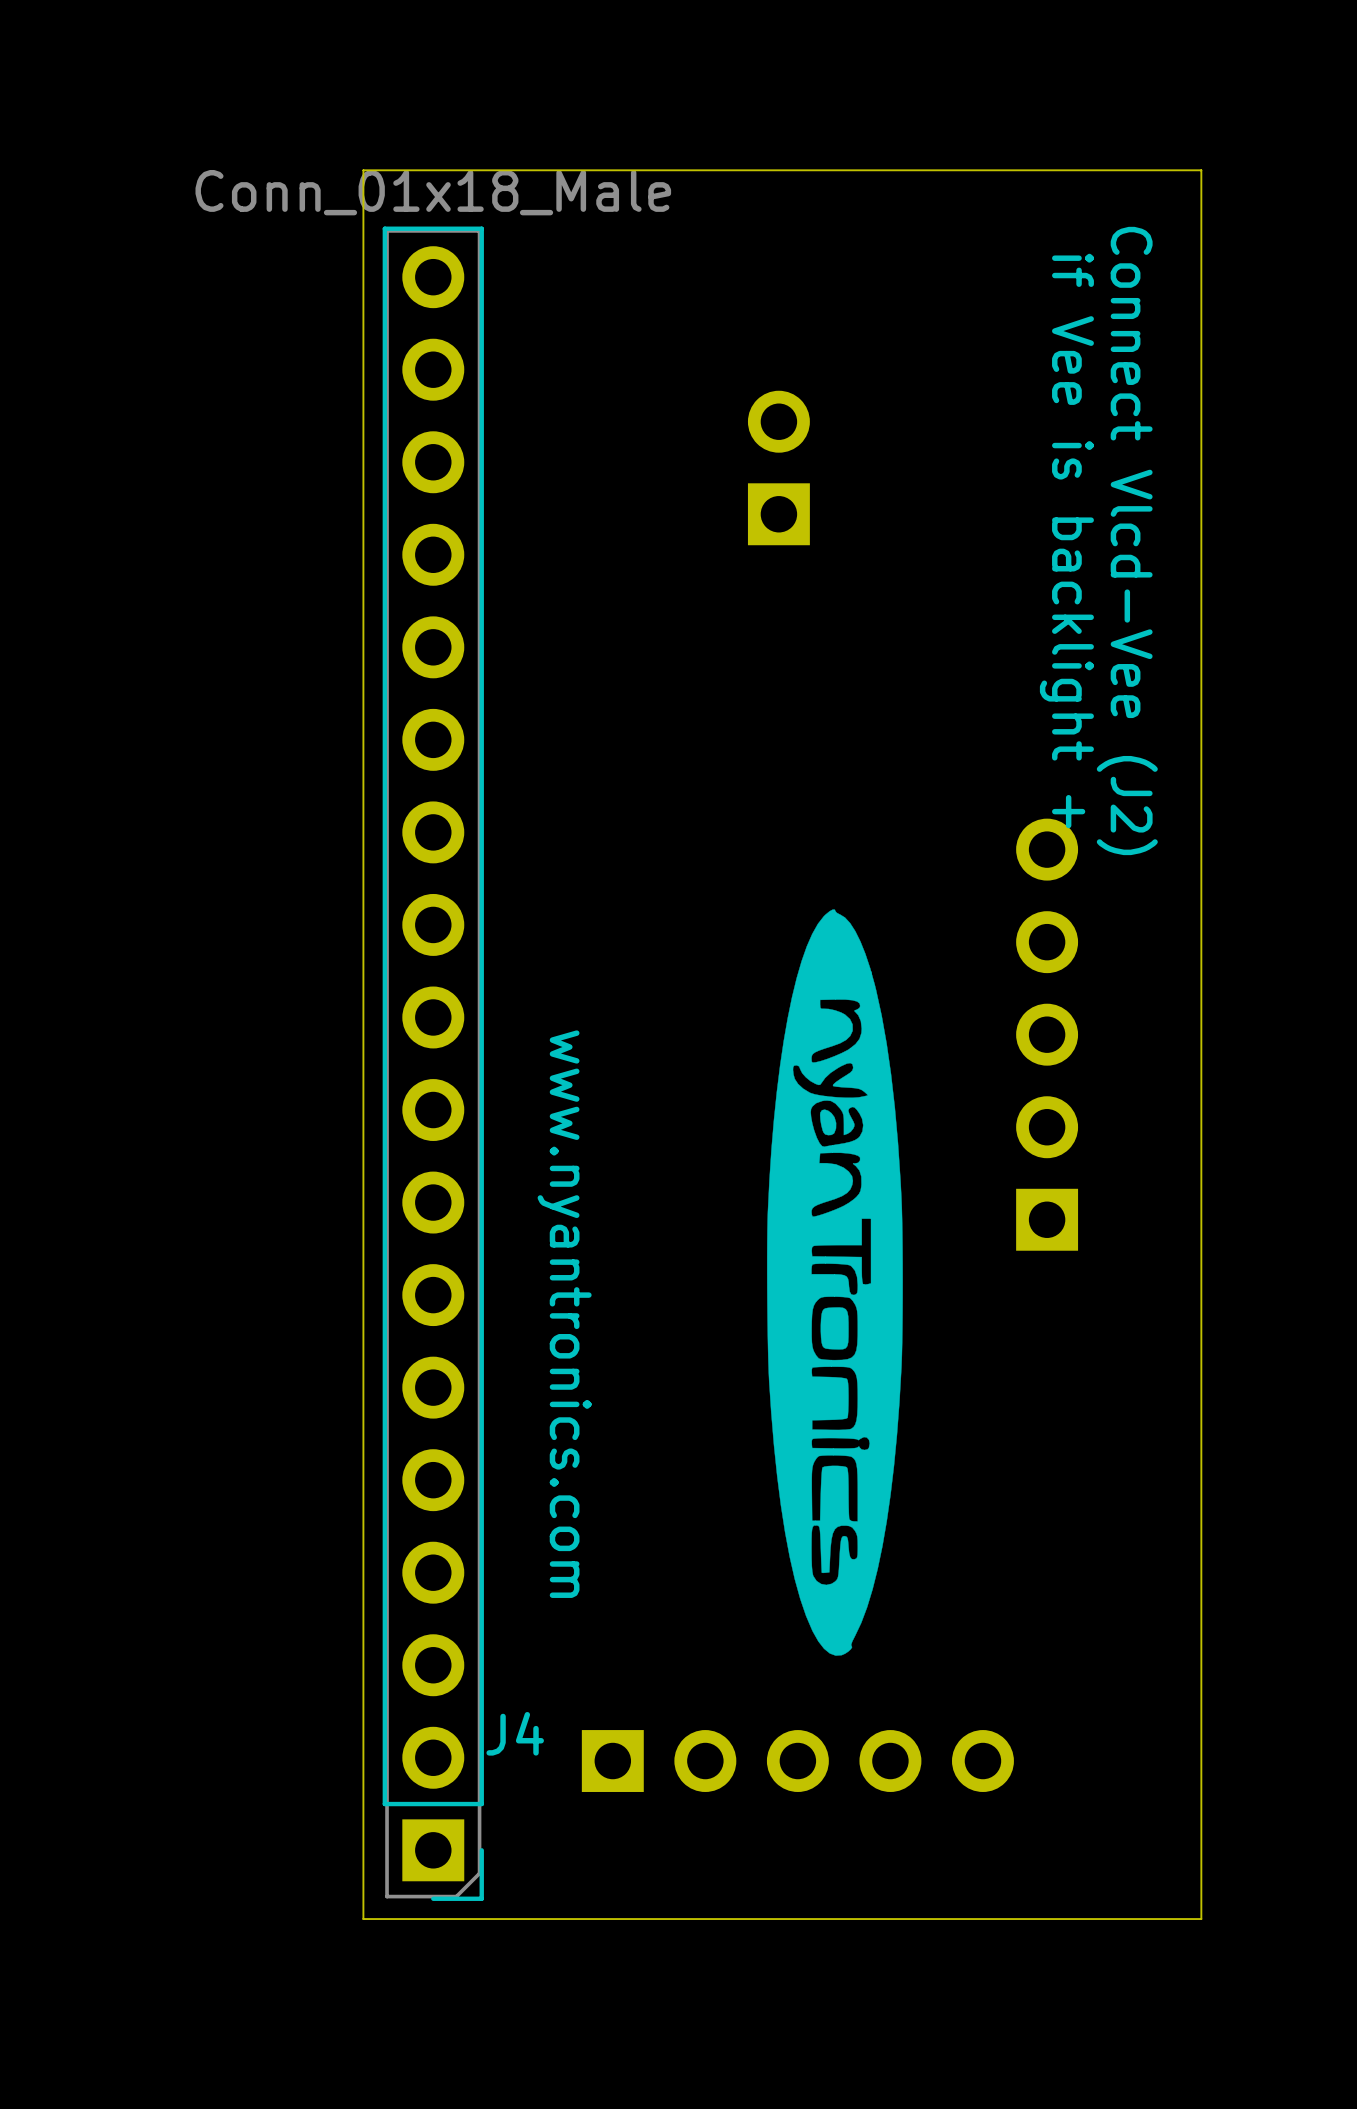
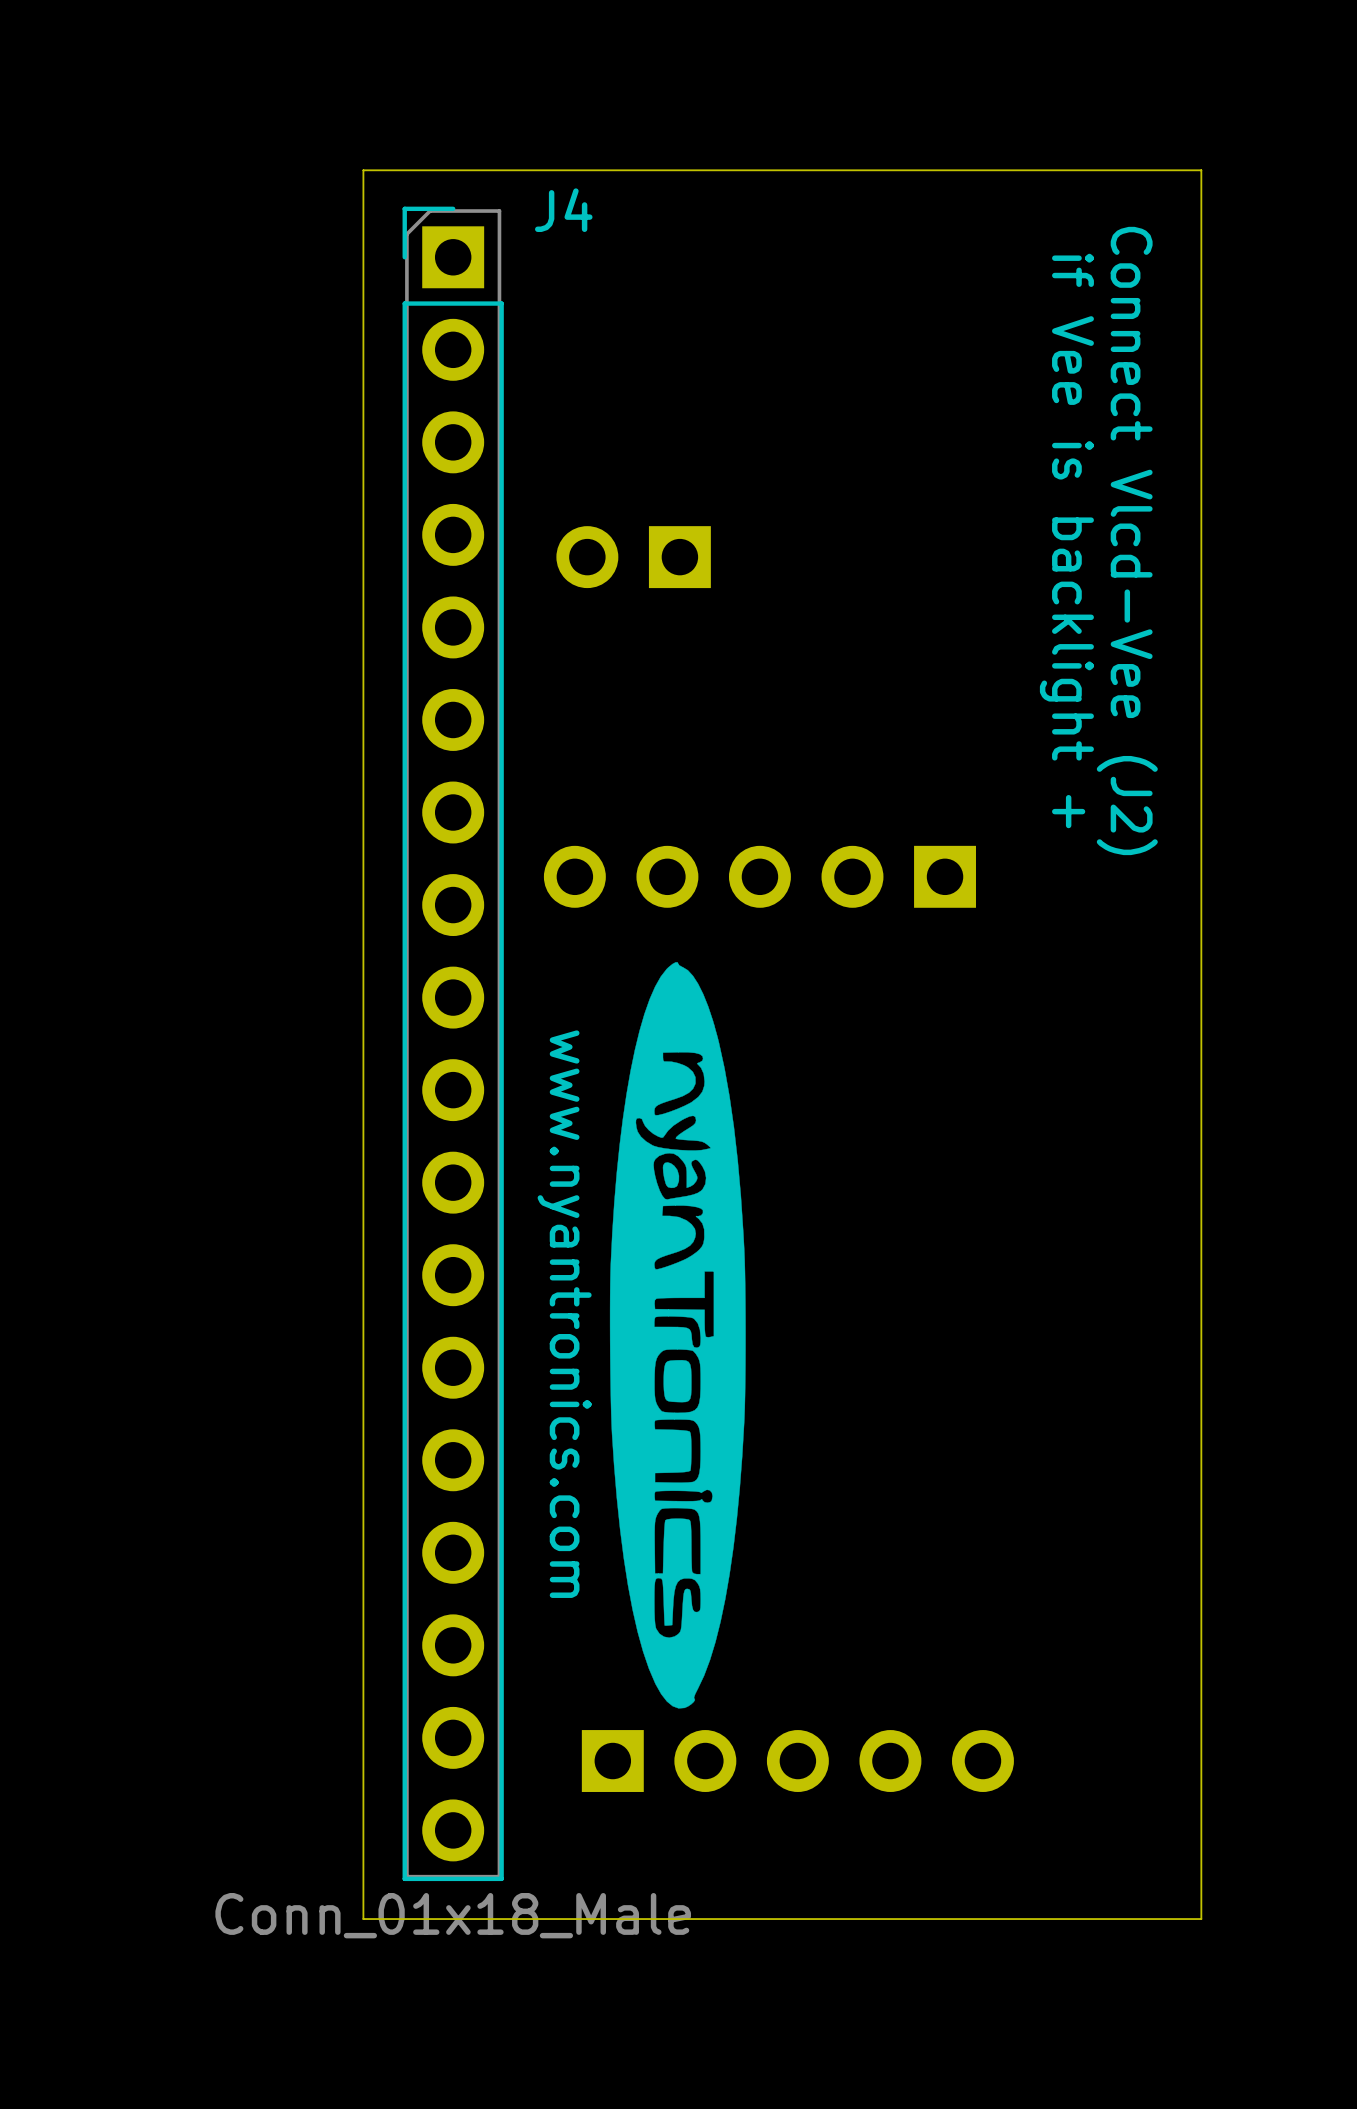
part rotation: 0° (778, 467) -> 90° counterclockwise (633, 557)
part position: (778, 467) -> (633, 557)
part rotation: 0° (1047, 1034) -> 90° counterclockwise (759, 876)
part position: (1047, 1034) -> (759, 876)
J4 rotation: 0° (433, 1063) -> 180° (453, 1043)
drawing position: (834, 1282) -> (677, 1335)
J4 name position: J4 (515, 1733) -> J4 (563, 210)

